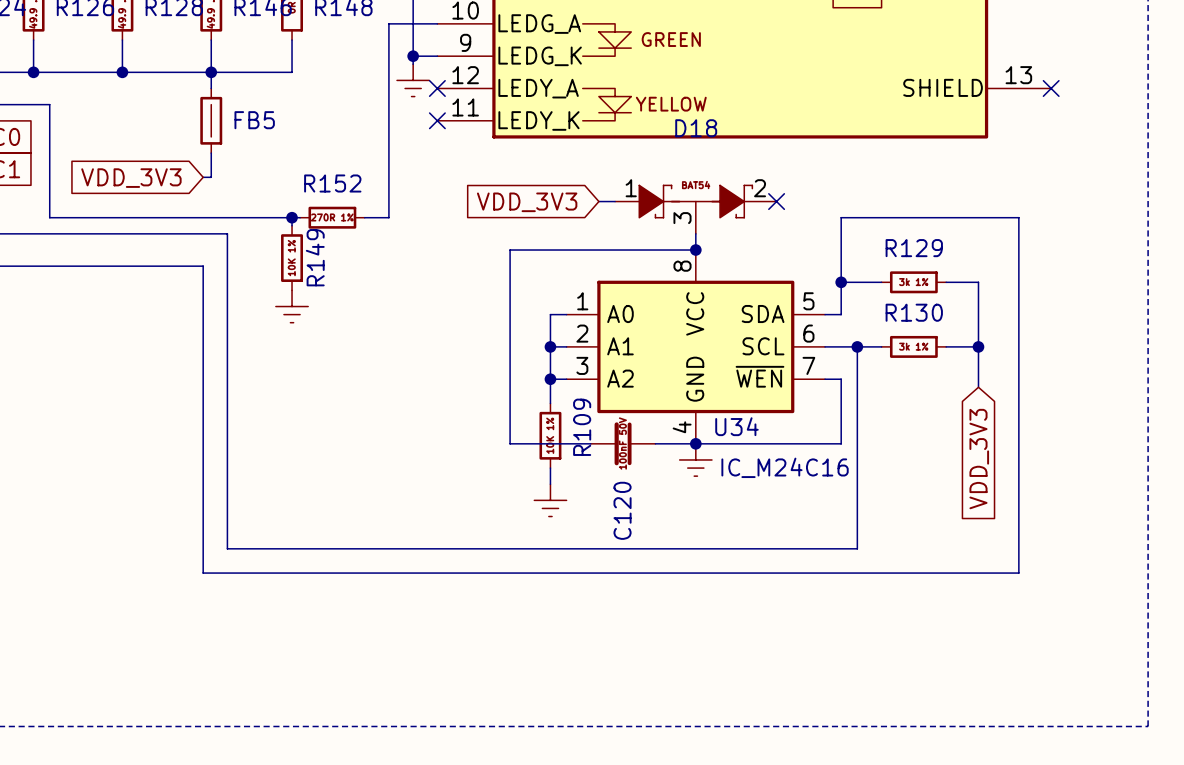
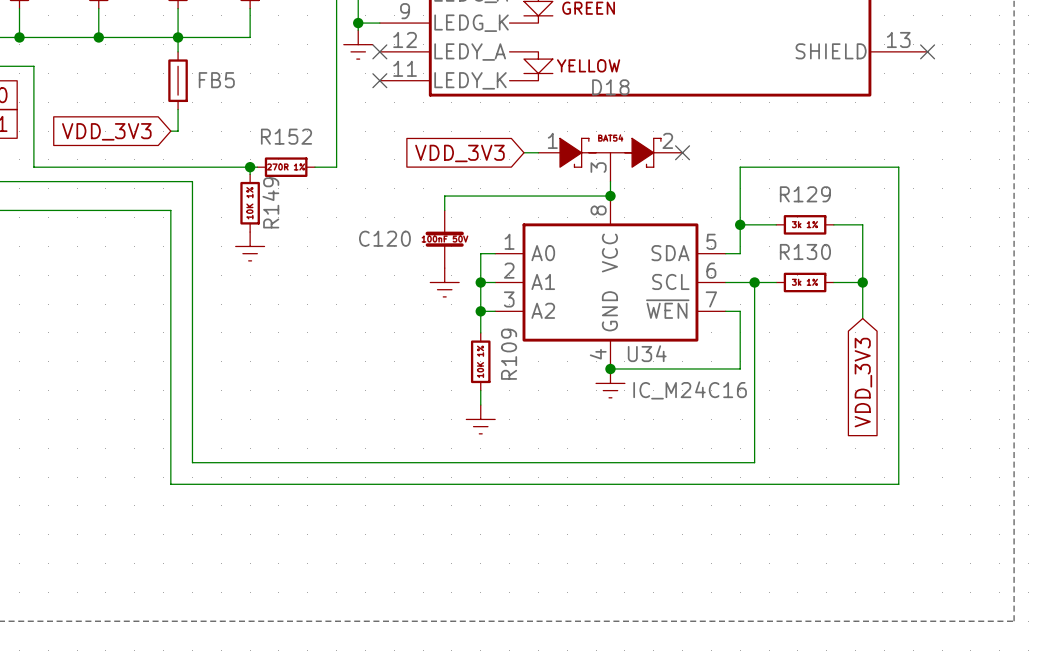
wire: (510, 266) (510, 443) (590, 443) -> none
power symbol: none -> (444, 282)
C120 rotation: 0° (623, 443) -> 90° clockwise (444, 239)
C120 position: (623, 443) -> (444, 239)
wire: (655, 443) (695, 443) -> none

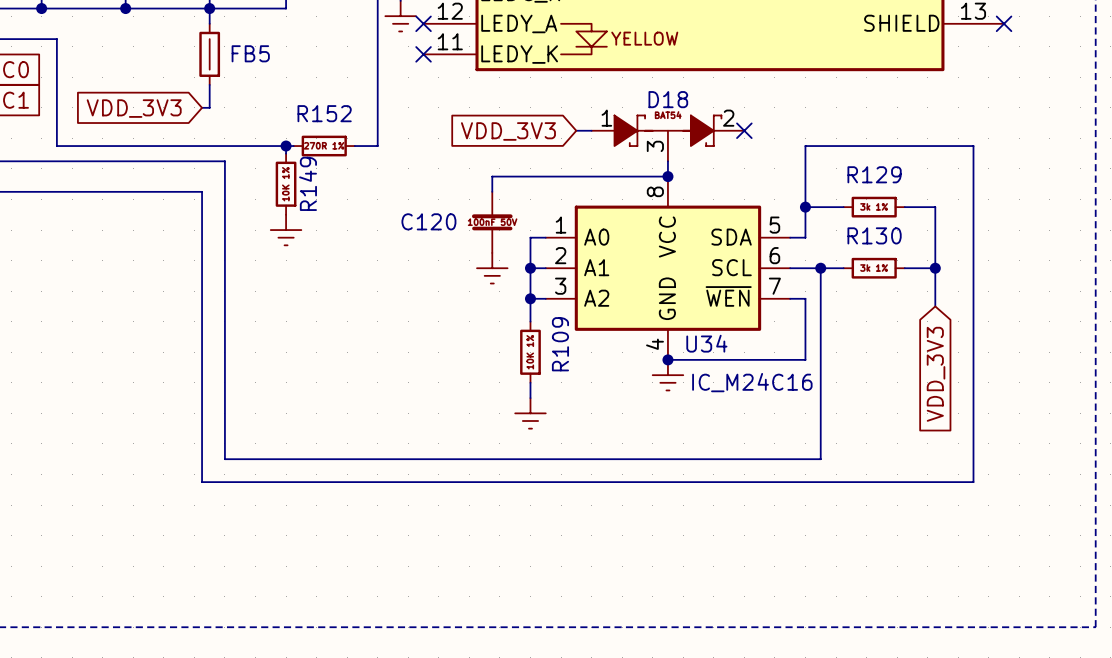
D18 name position: D18 (610, 87) -> D18 (668, 99)

